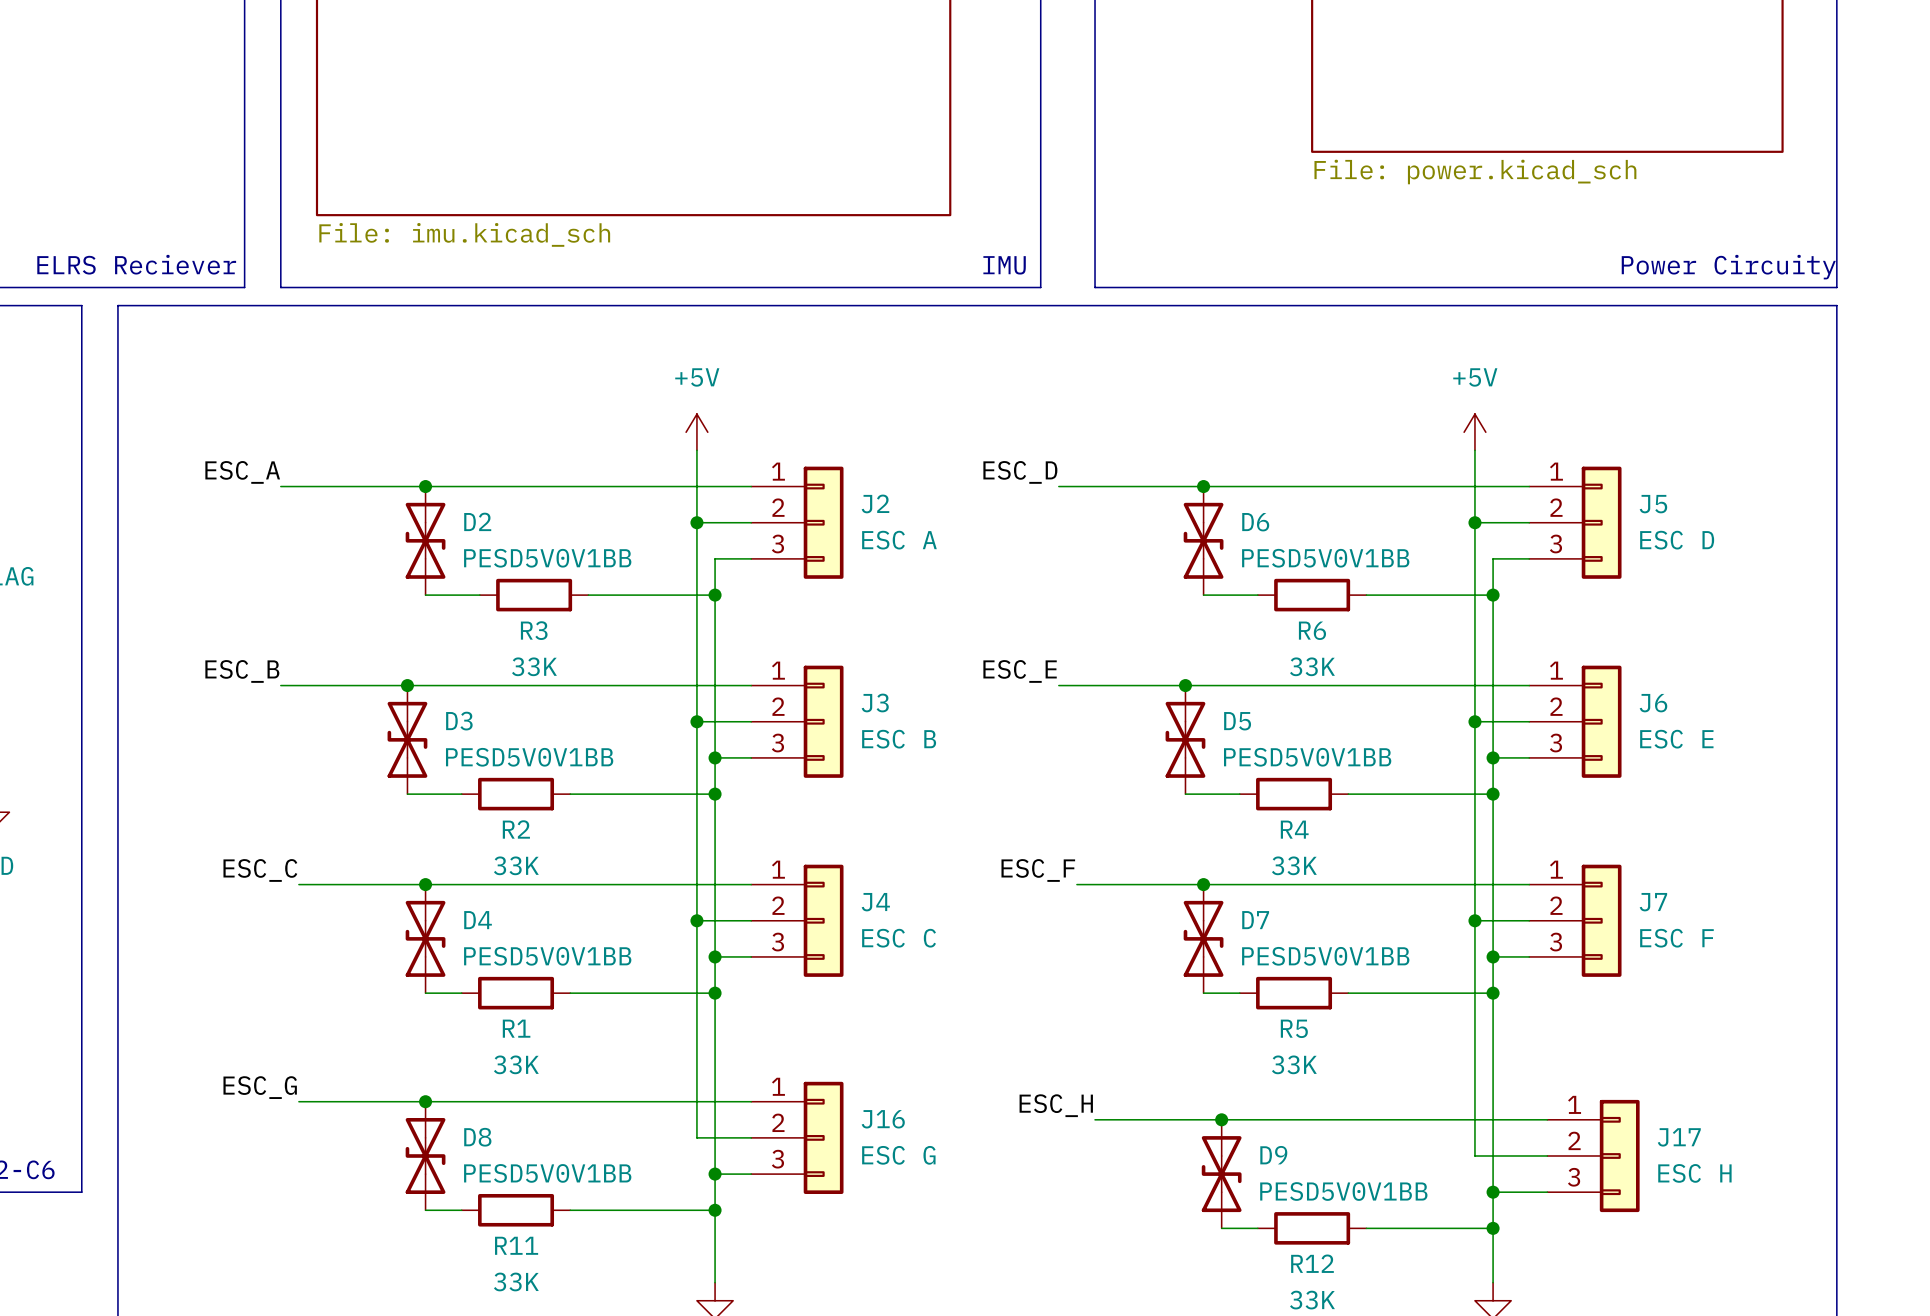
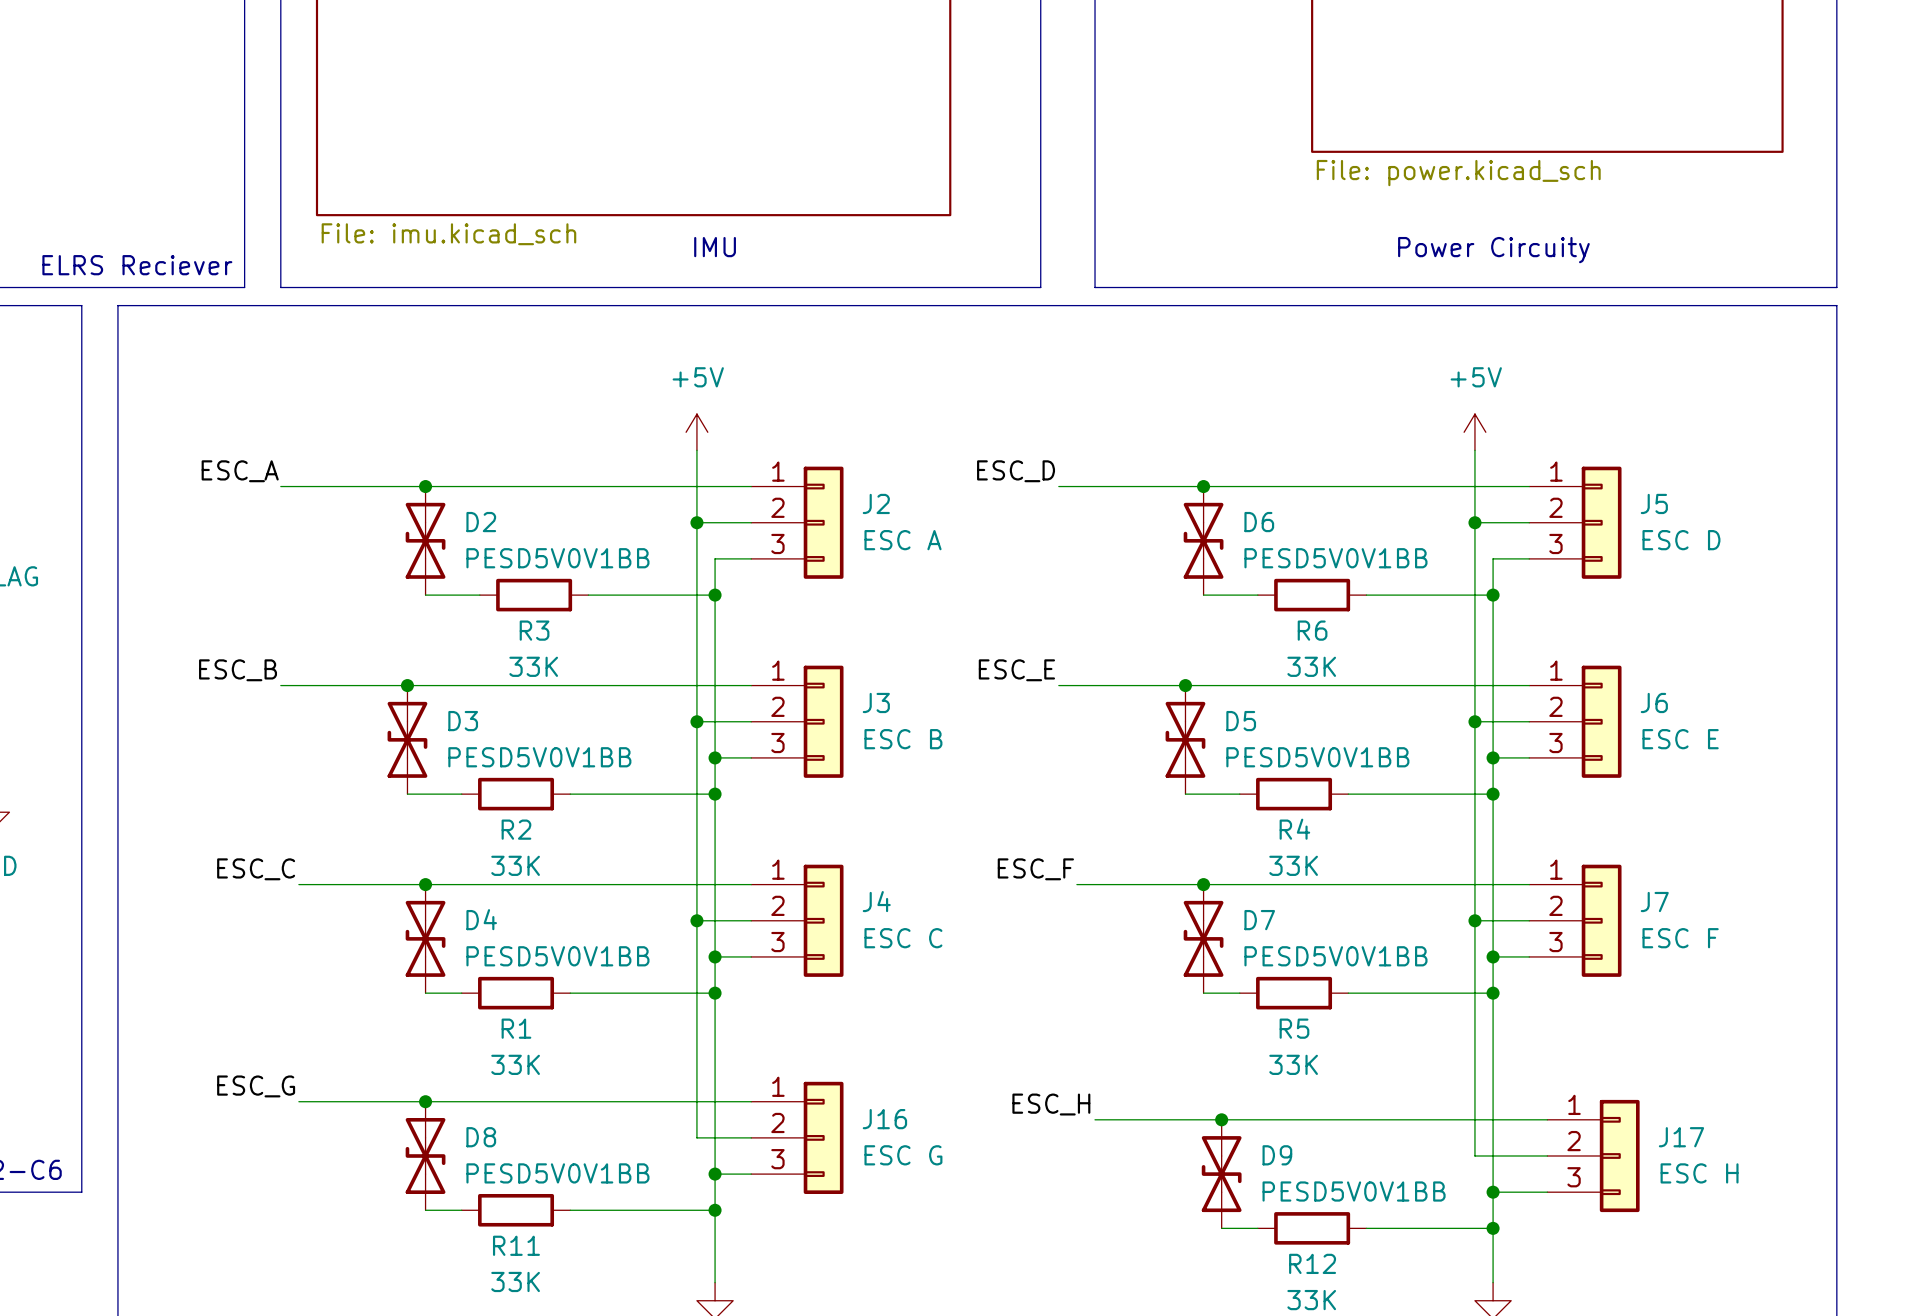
text position: IMU (1004, 265) -> IMU (715, 247)
text position: Power Circuity (1728, 267) -> Power Circuity (1493, 250)

